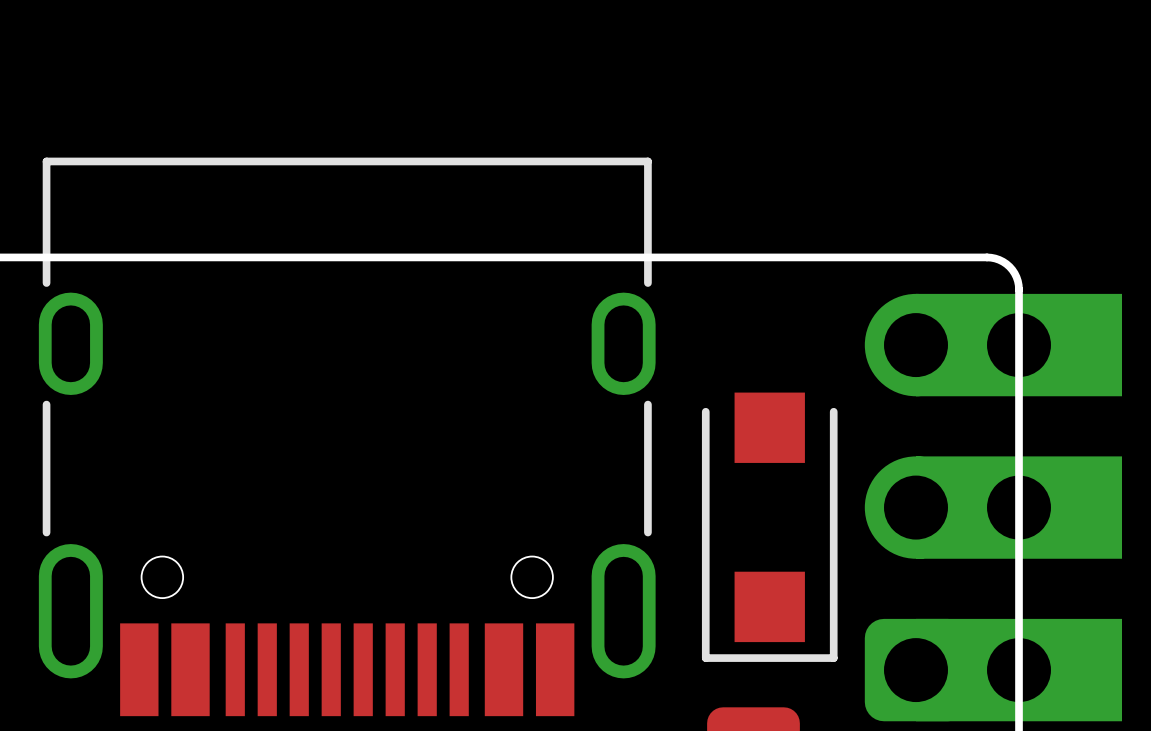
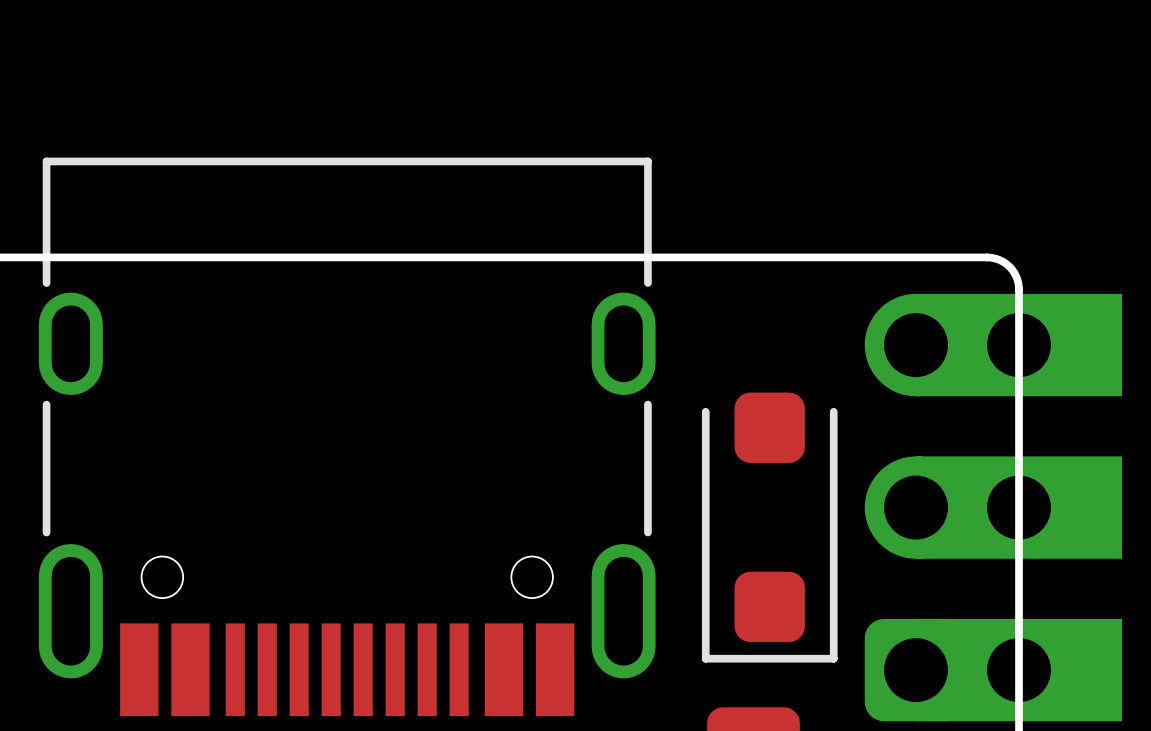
part footprint: [701, 392, 838, 662] -> [701, 392, 838, 663]

